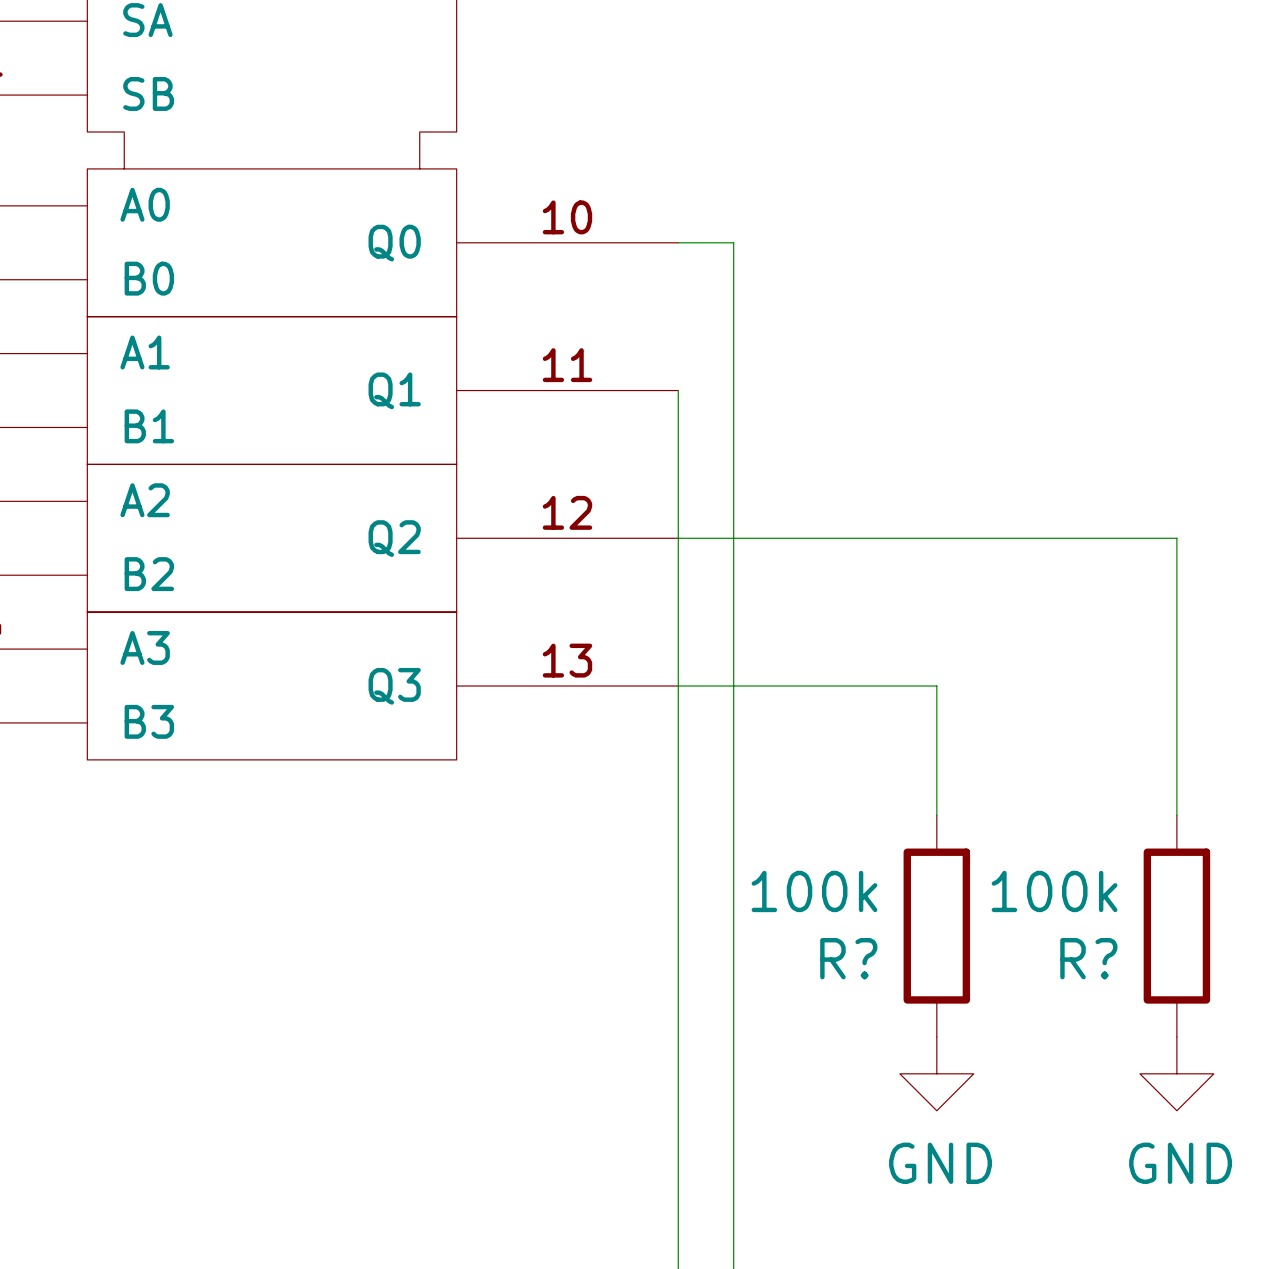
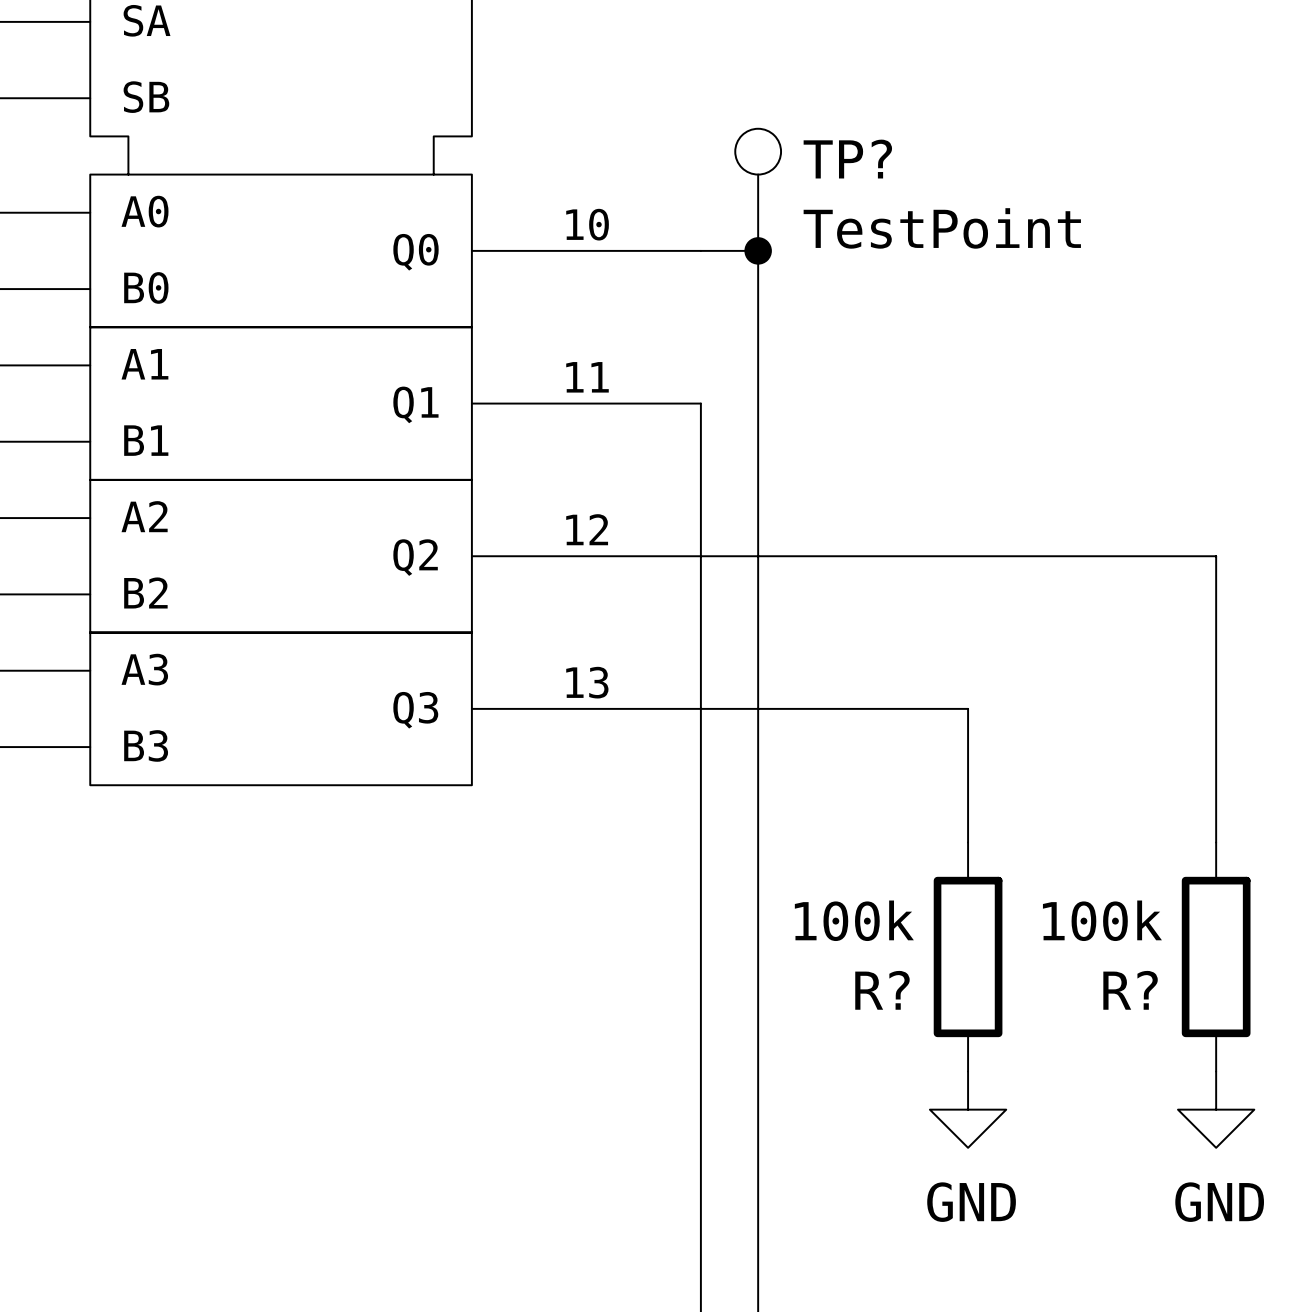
TP?: none -> TestPoint (758, 189)
junction: none -> (758, 250)

